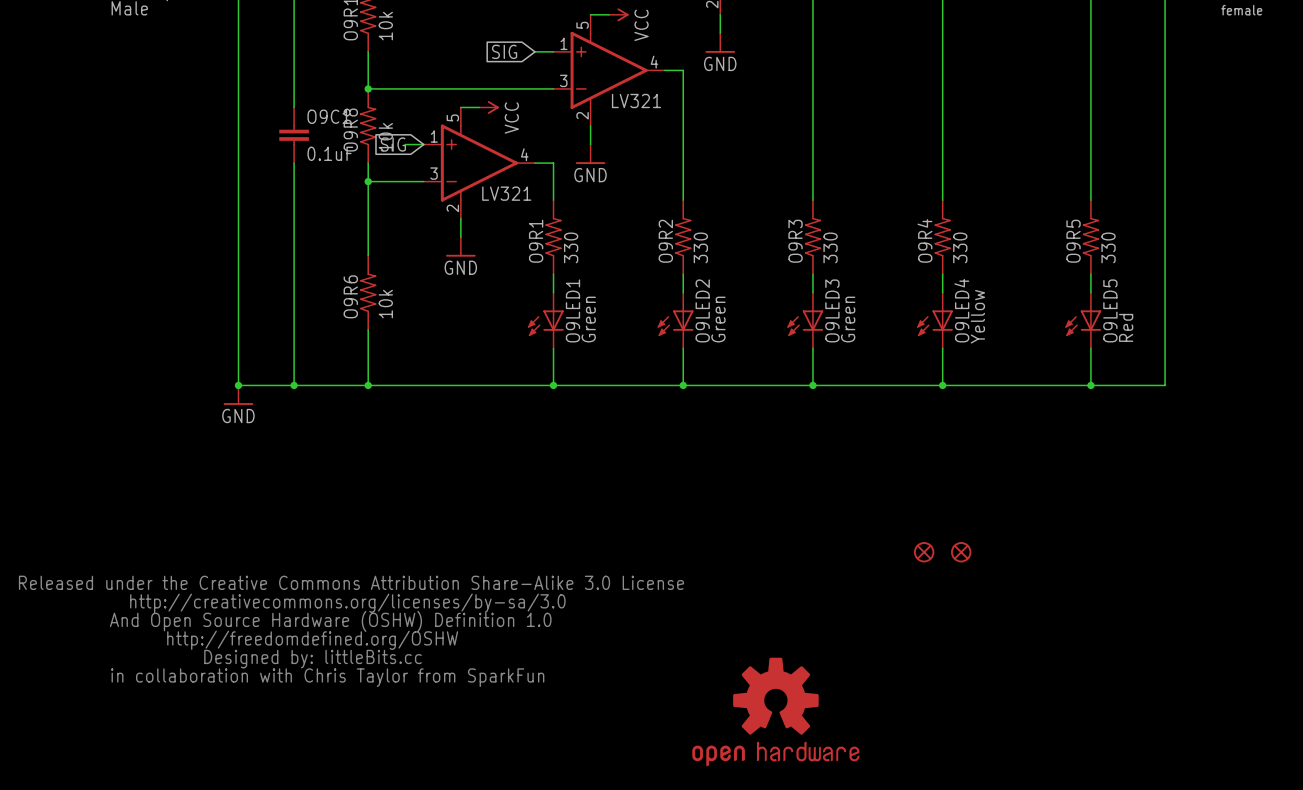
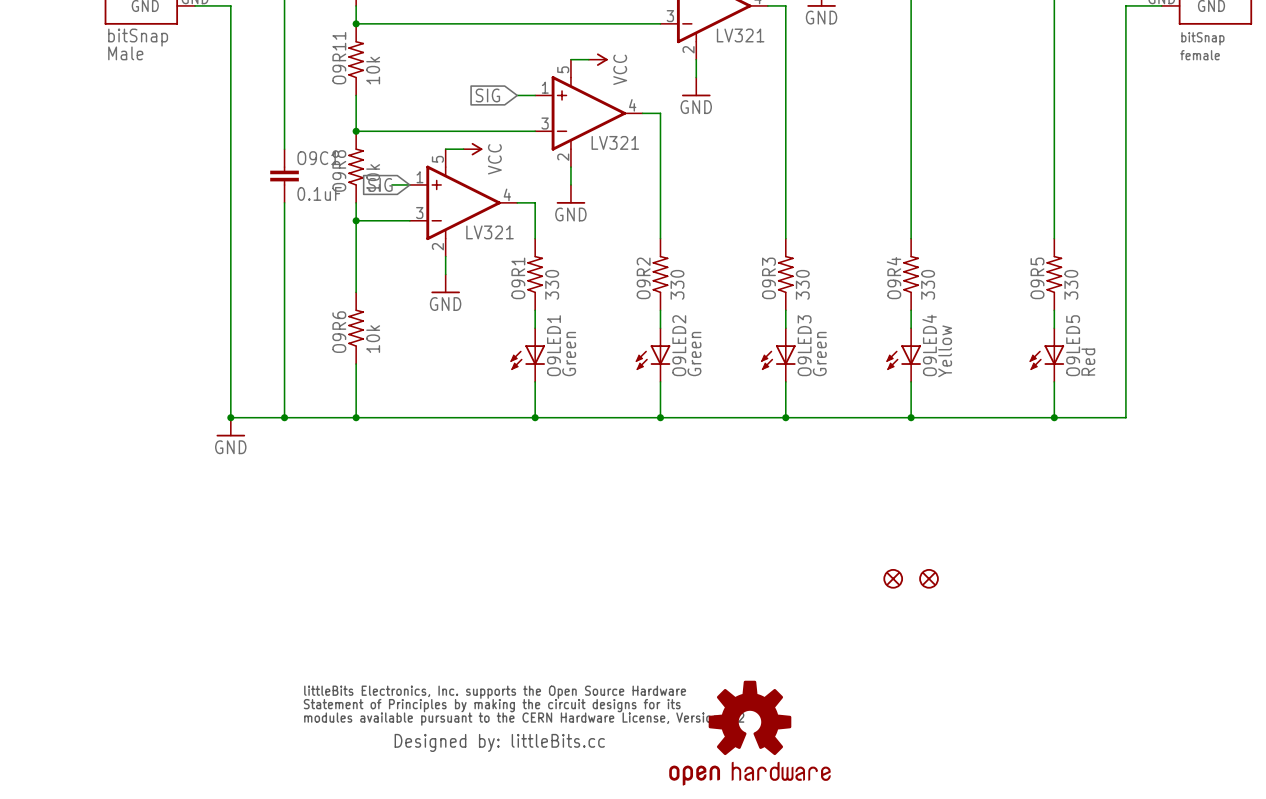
part: (351, 631) -> none
part: none -> (524, 718)

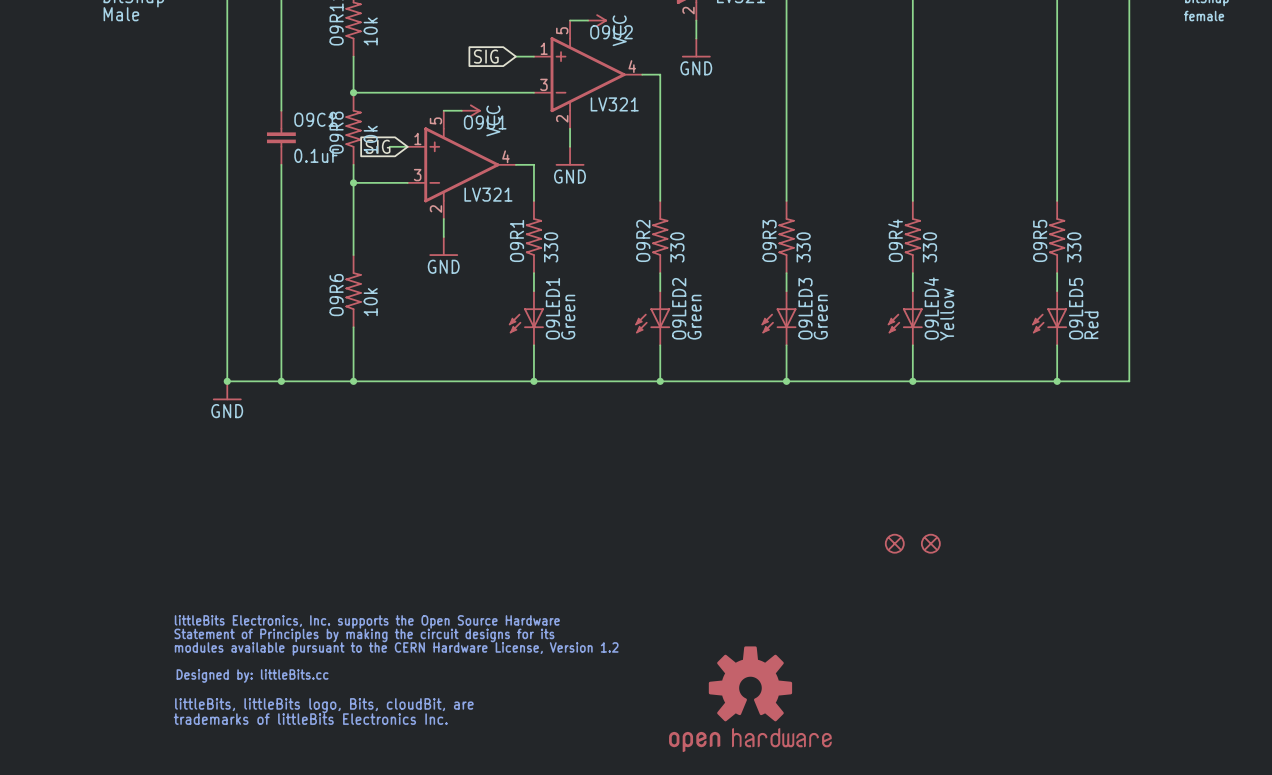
O9U2 name: none -> O9U2 (611, 32)
O9U1 name: none -> O9U1 (485, 122)
part: none -> (396, 670)
part: (524, 718) -> none

